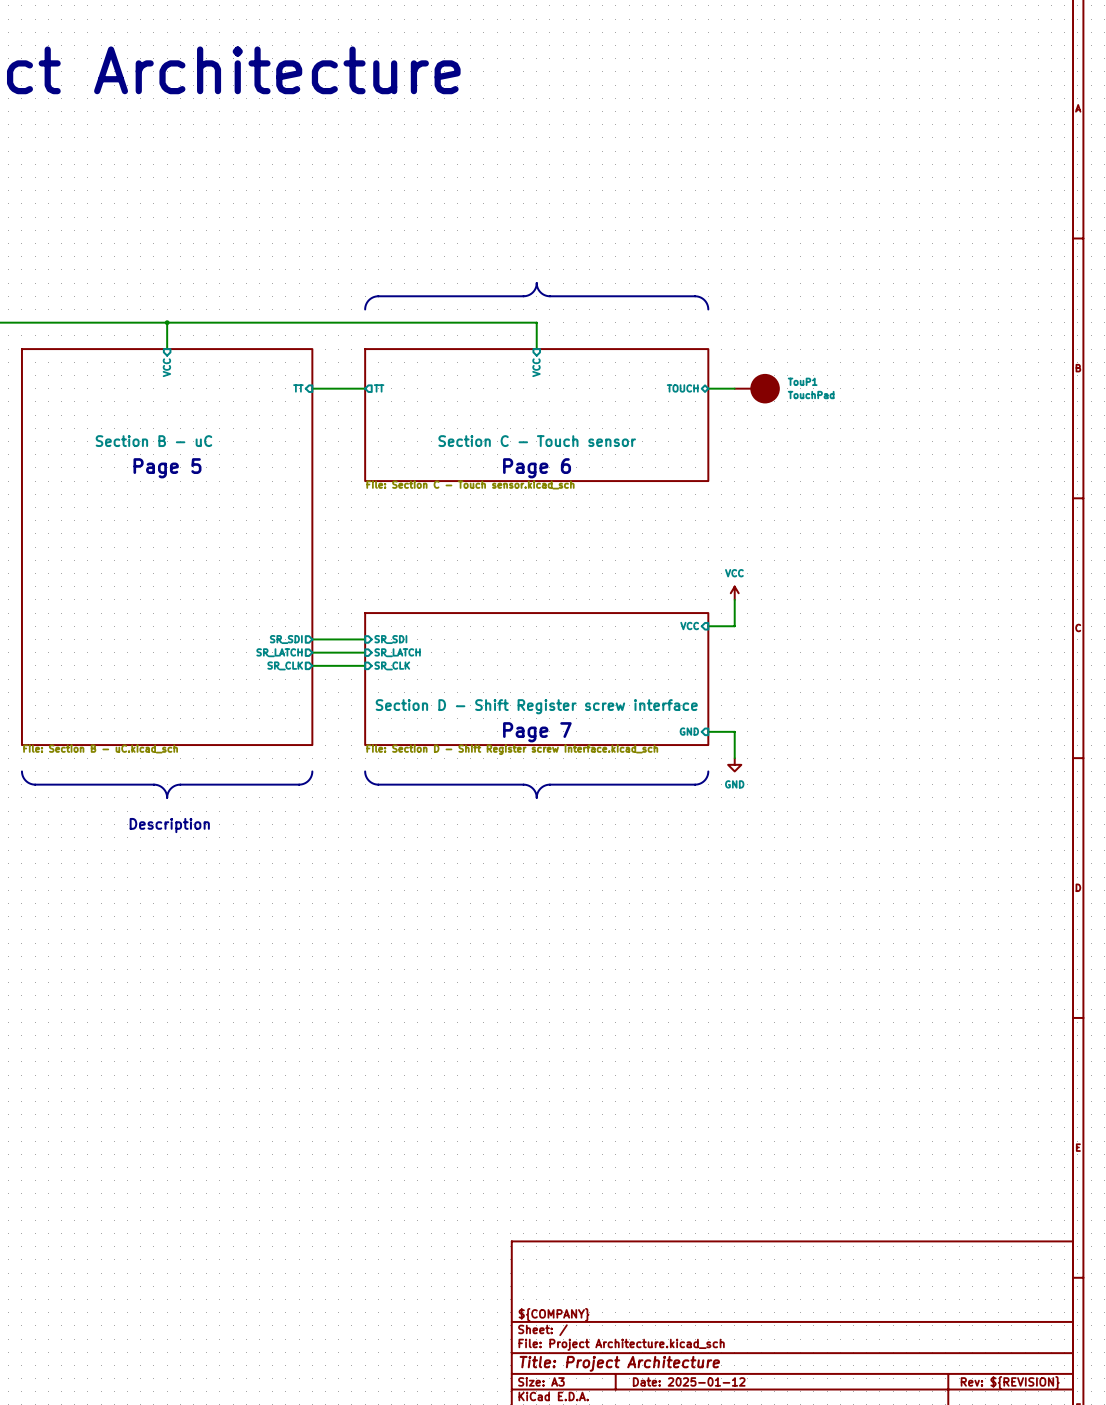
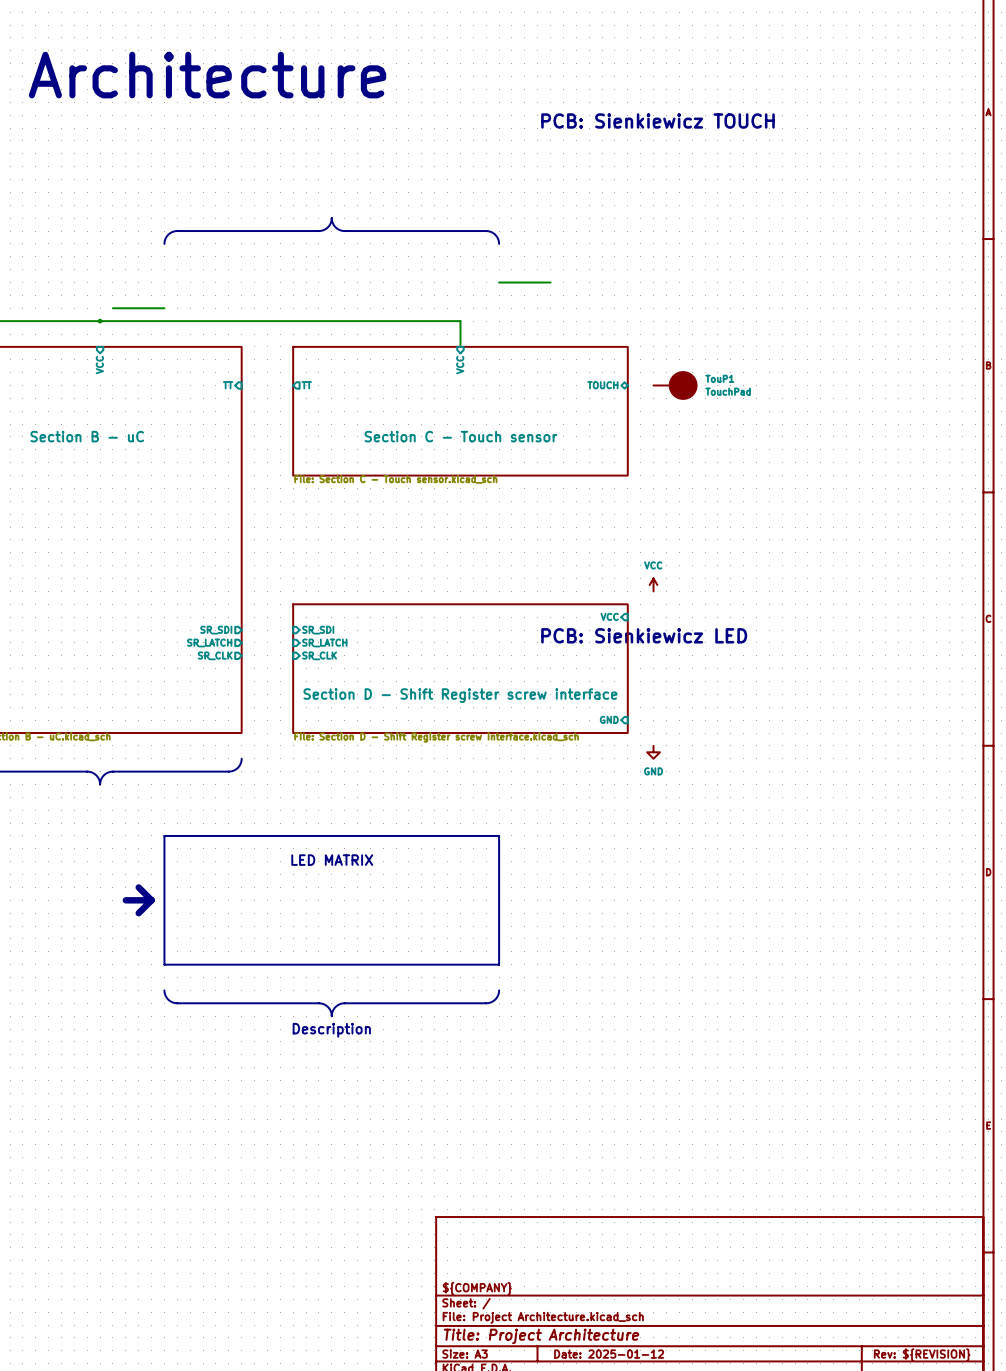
text: none -> PCB: Sienkiewicz TOUCH (657, 120)
line: none -> (164, 243) (167, 235) (175, 231) (320, 230) (328, 226) (331, 218) (334, 226) (343, 230) (487, 231) (496, 235) (499, 243)
wire: none -> (499, 282) (550, 282)
wire: none -> (112, 308) (164, 308)
line: (365, 309) (369, 300) (376, 296) (525, 296) (533, 291) (536, 283) (540, 292) (548, 296) (696, 296) (704, 300) (708, 309) -> none
wire: (167, 322) (167, 349) -> none
wire: (312, 388) (365, 388) -> none
wire: (708, 388) (734, 388) -> none
text: Page 5 (167, 468) -> none
text: Page 6 (537, 468) -> none
wire: (734, 599) (734, 626) (708, 626) -> none
wire: (312, 639) (365, 639) -> none
text: none -> PCB: Sienkiewicz LED (644, 635)
wire: (312, 652) (365, 652) -> none
wire: (312, 665) (365, 665) -> none
wire: (708, 731) (734, 731) (734, 758) -> none
text: Page 7 (537, 732) -> none
line: (365, 771) (369, 780) (376, 784) (525, 784) (532, 788) (536, 797) (539, 789) (548, 784) (696, 784) (704, 780) (708, 771) -> none
text: Description (169, 825) -> none
line: none -> (164, 835) (499, 835) (499, 964) (164, 964) (164, 835)
text: none -> LED MATRIX (332, 860)
line: none -> (138, 887) (151, 900)
line: none -> (125, 900) (151, 900)
line: none -> (151, 900) (138, 913)
line: none -> (164, 990) (168, 999) (175, 1003) (320, 1003) (328, 1008) (331, 1016) (335, 1007) (343, 1003) (487, 1003) (495, 999) (499, 990)
text: none -> Description (331, 1030)

